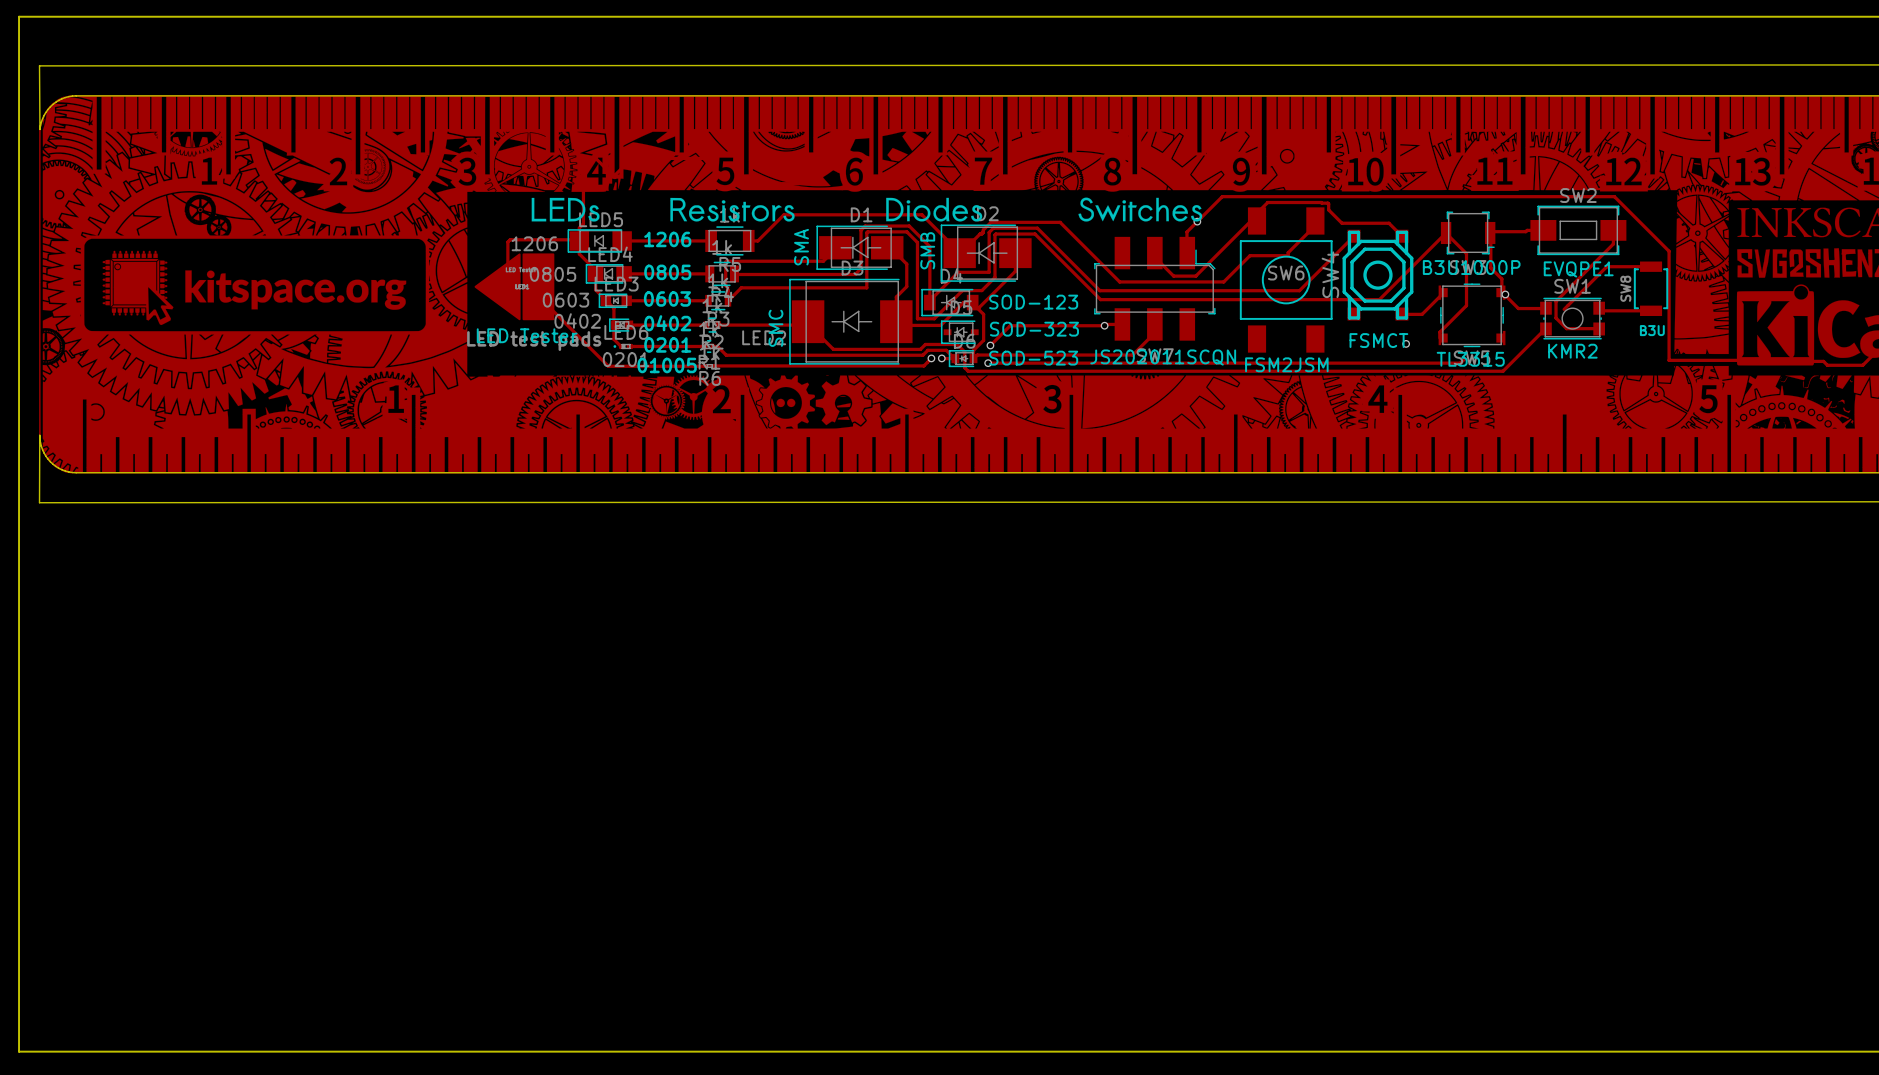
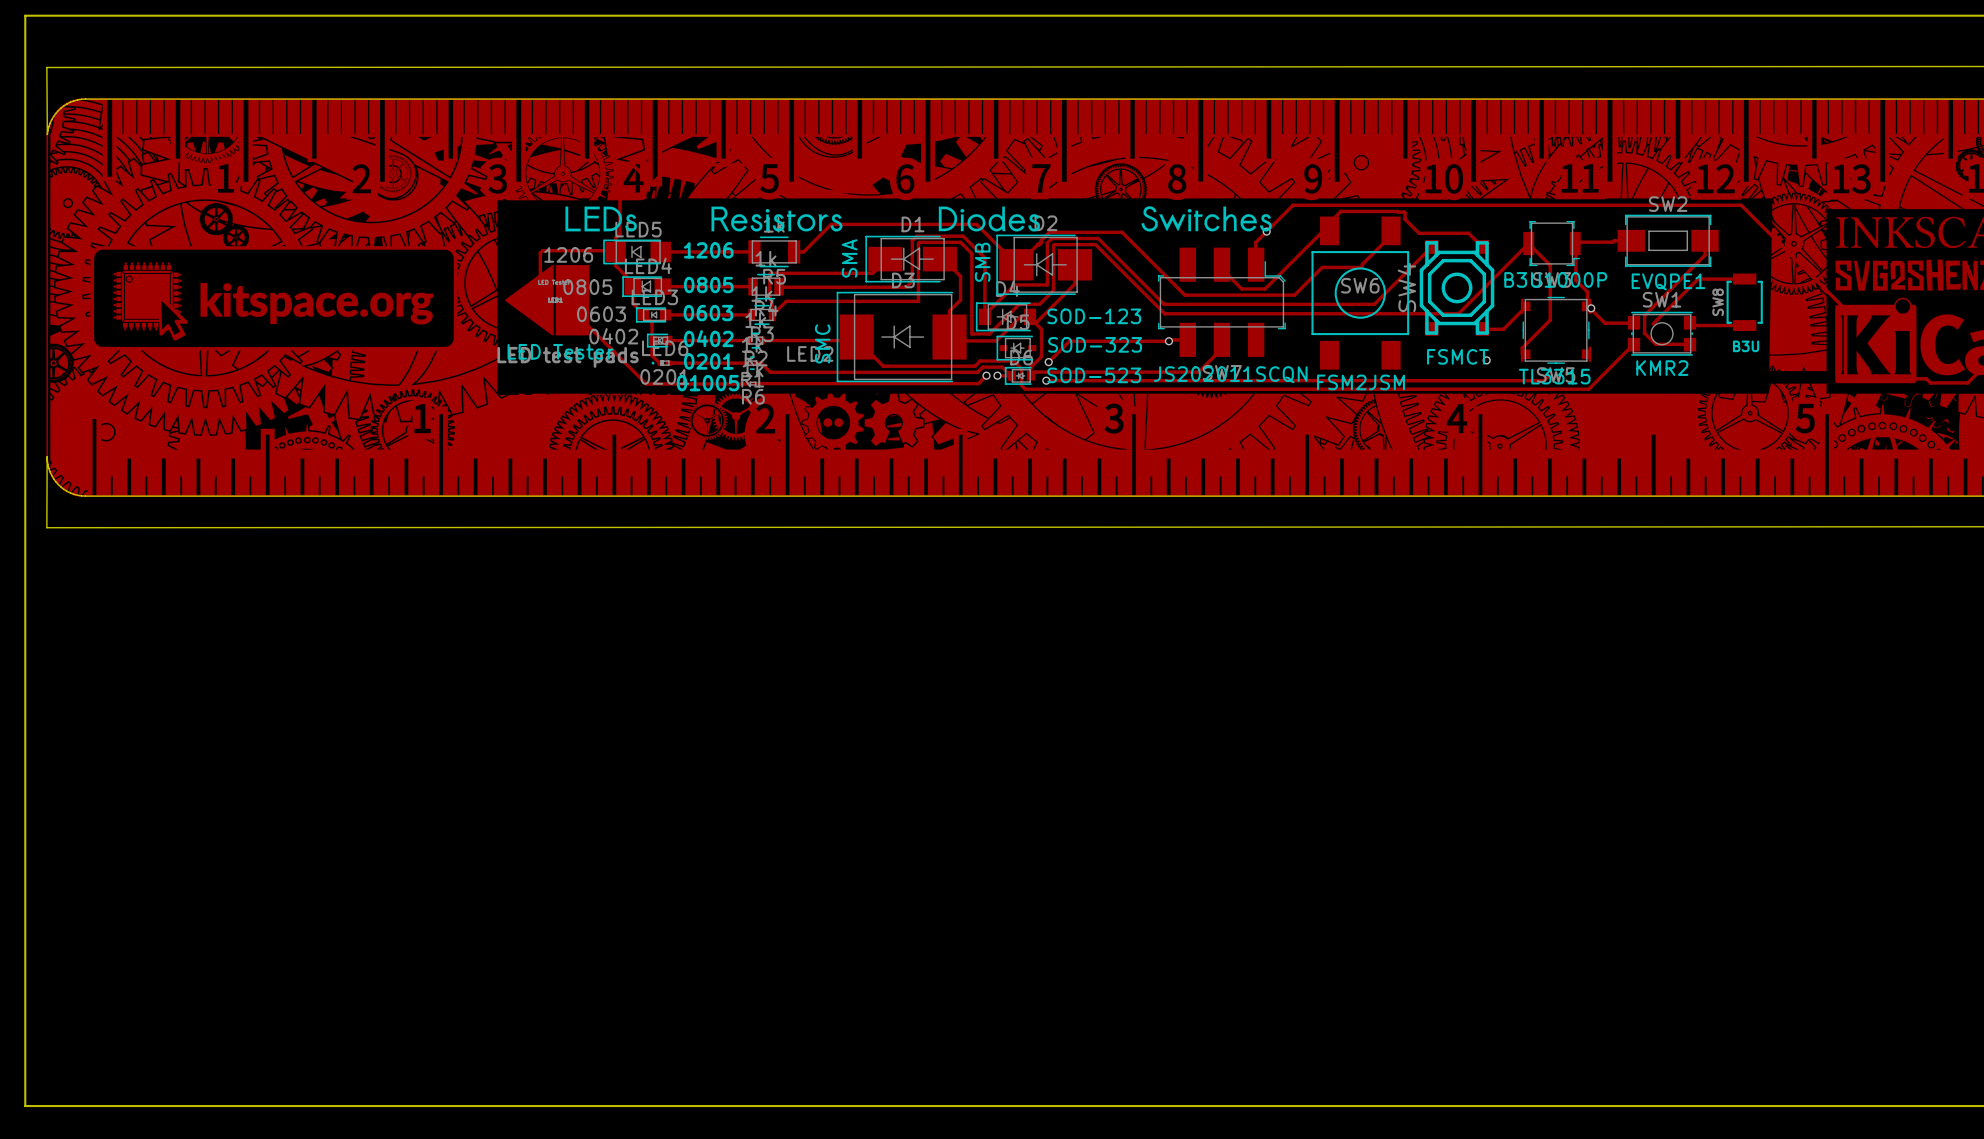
track: (1614, 196) (1669, 251) (1669, 360) (1746, 360) -> (1706, 205) (1741, 205) (1845, 309) (1845, 378)

